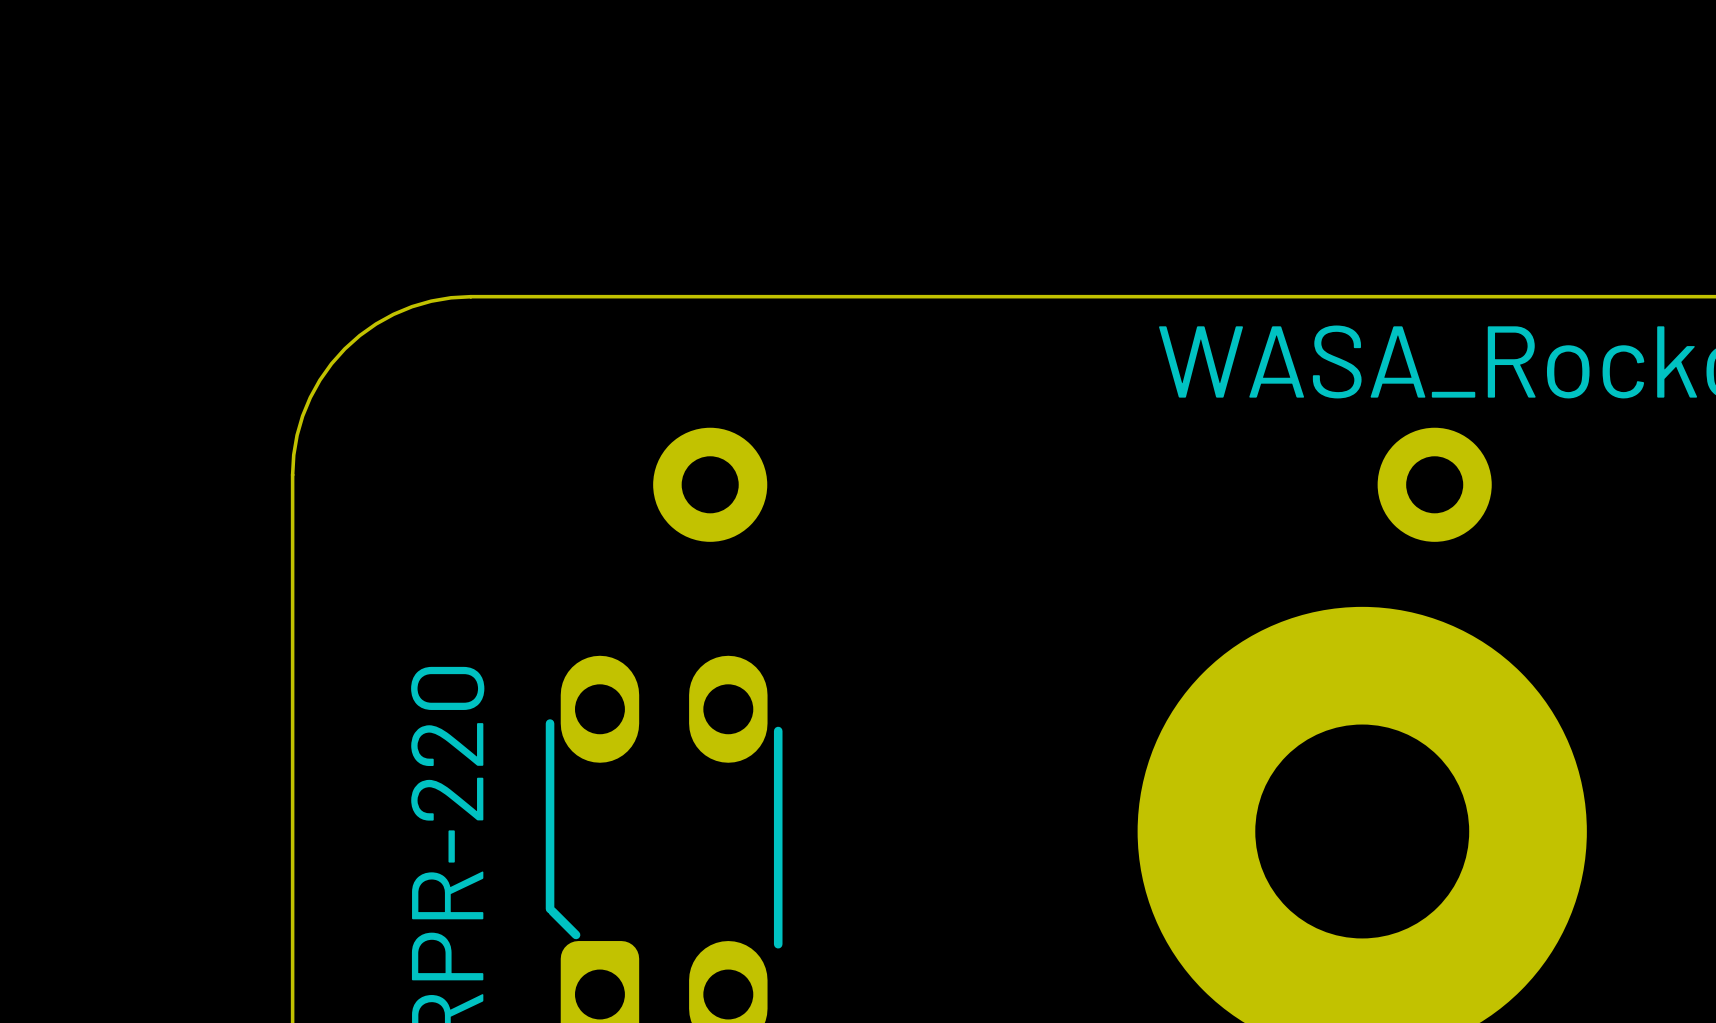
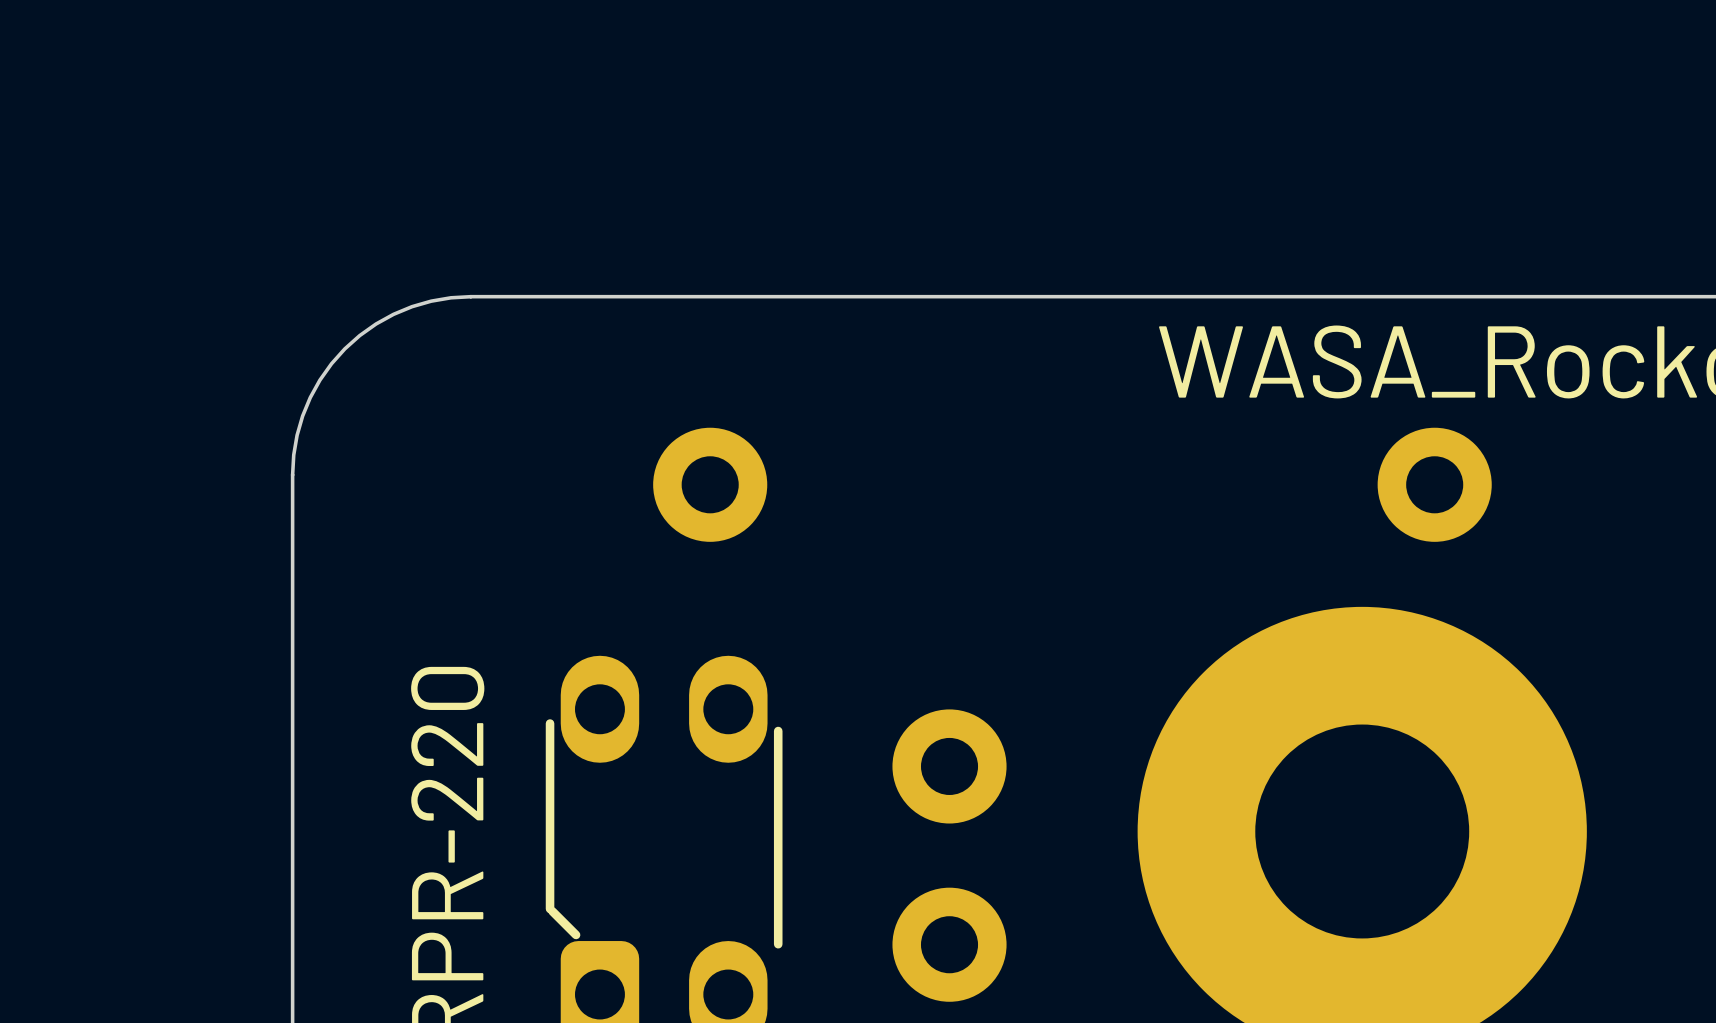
part: none -> (949, 855)

